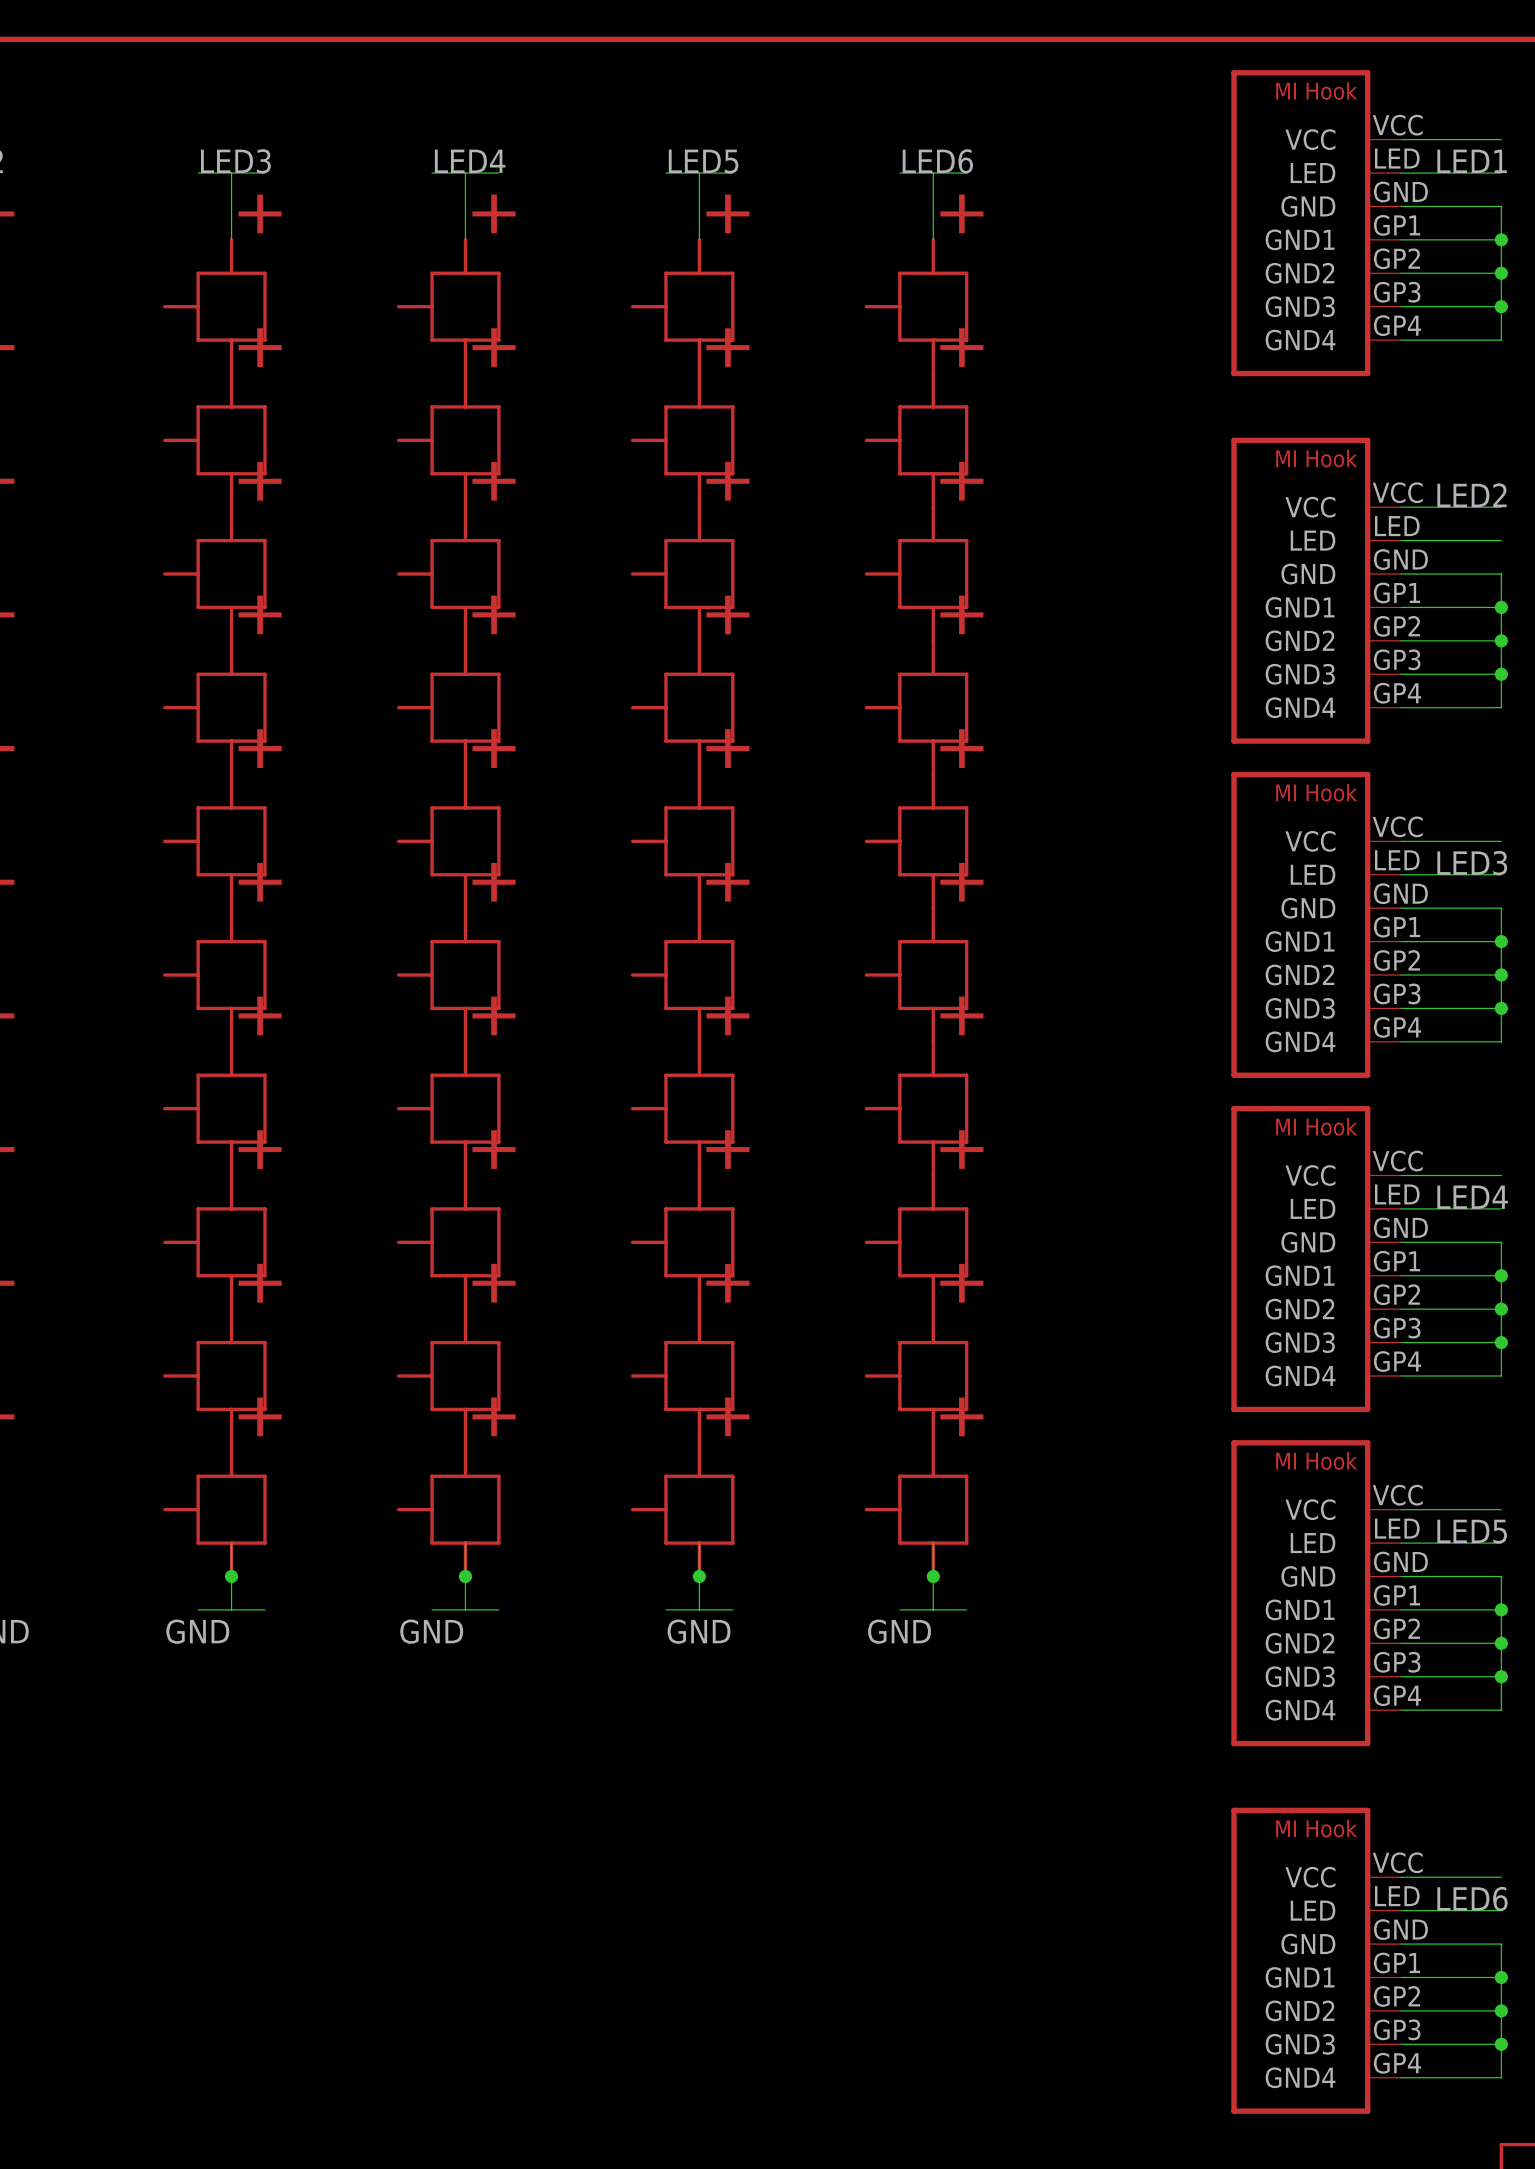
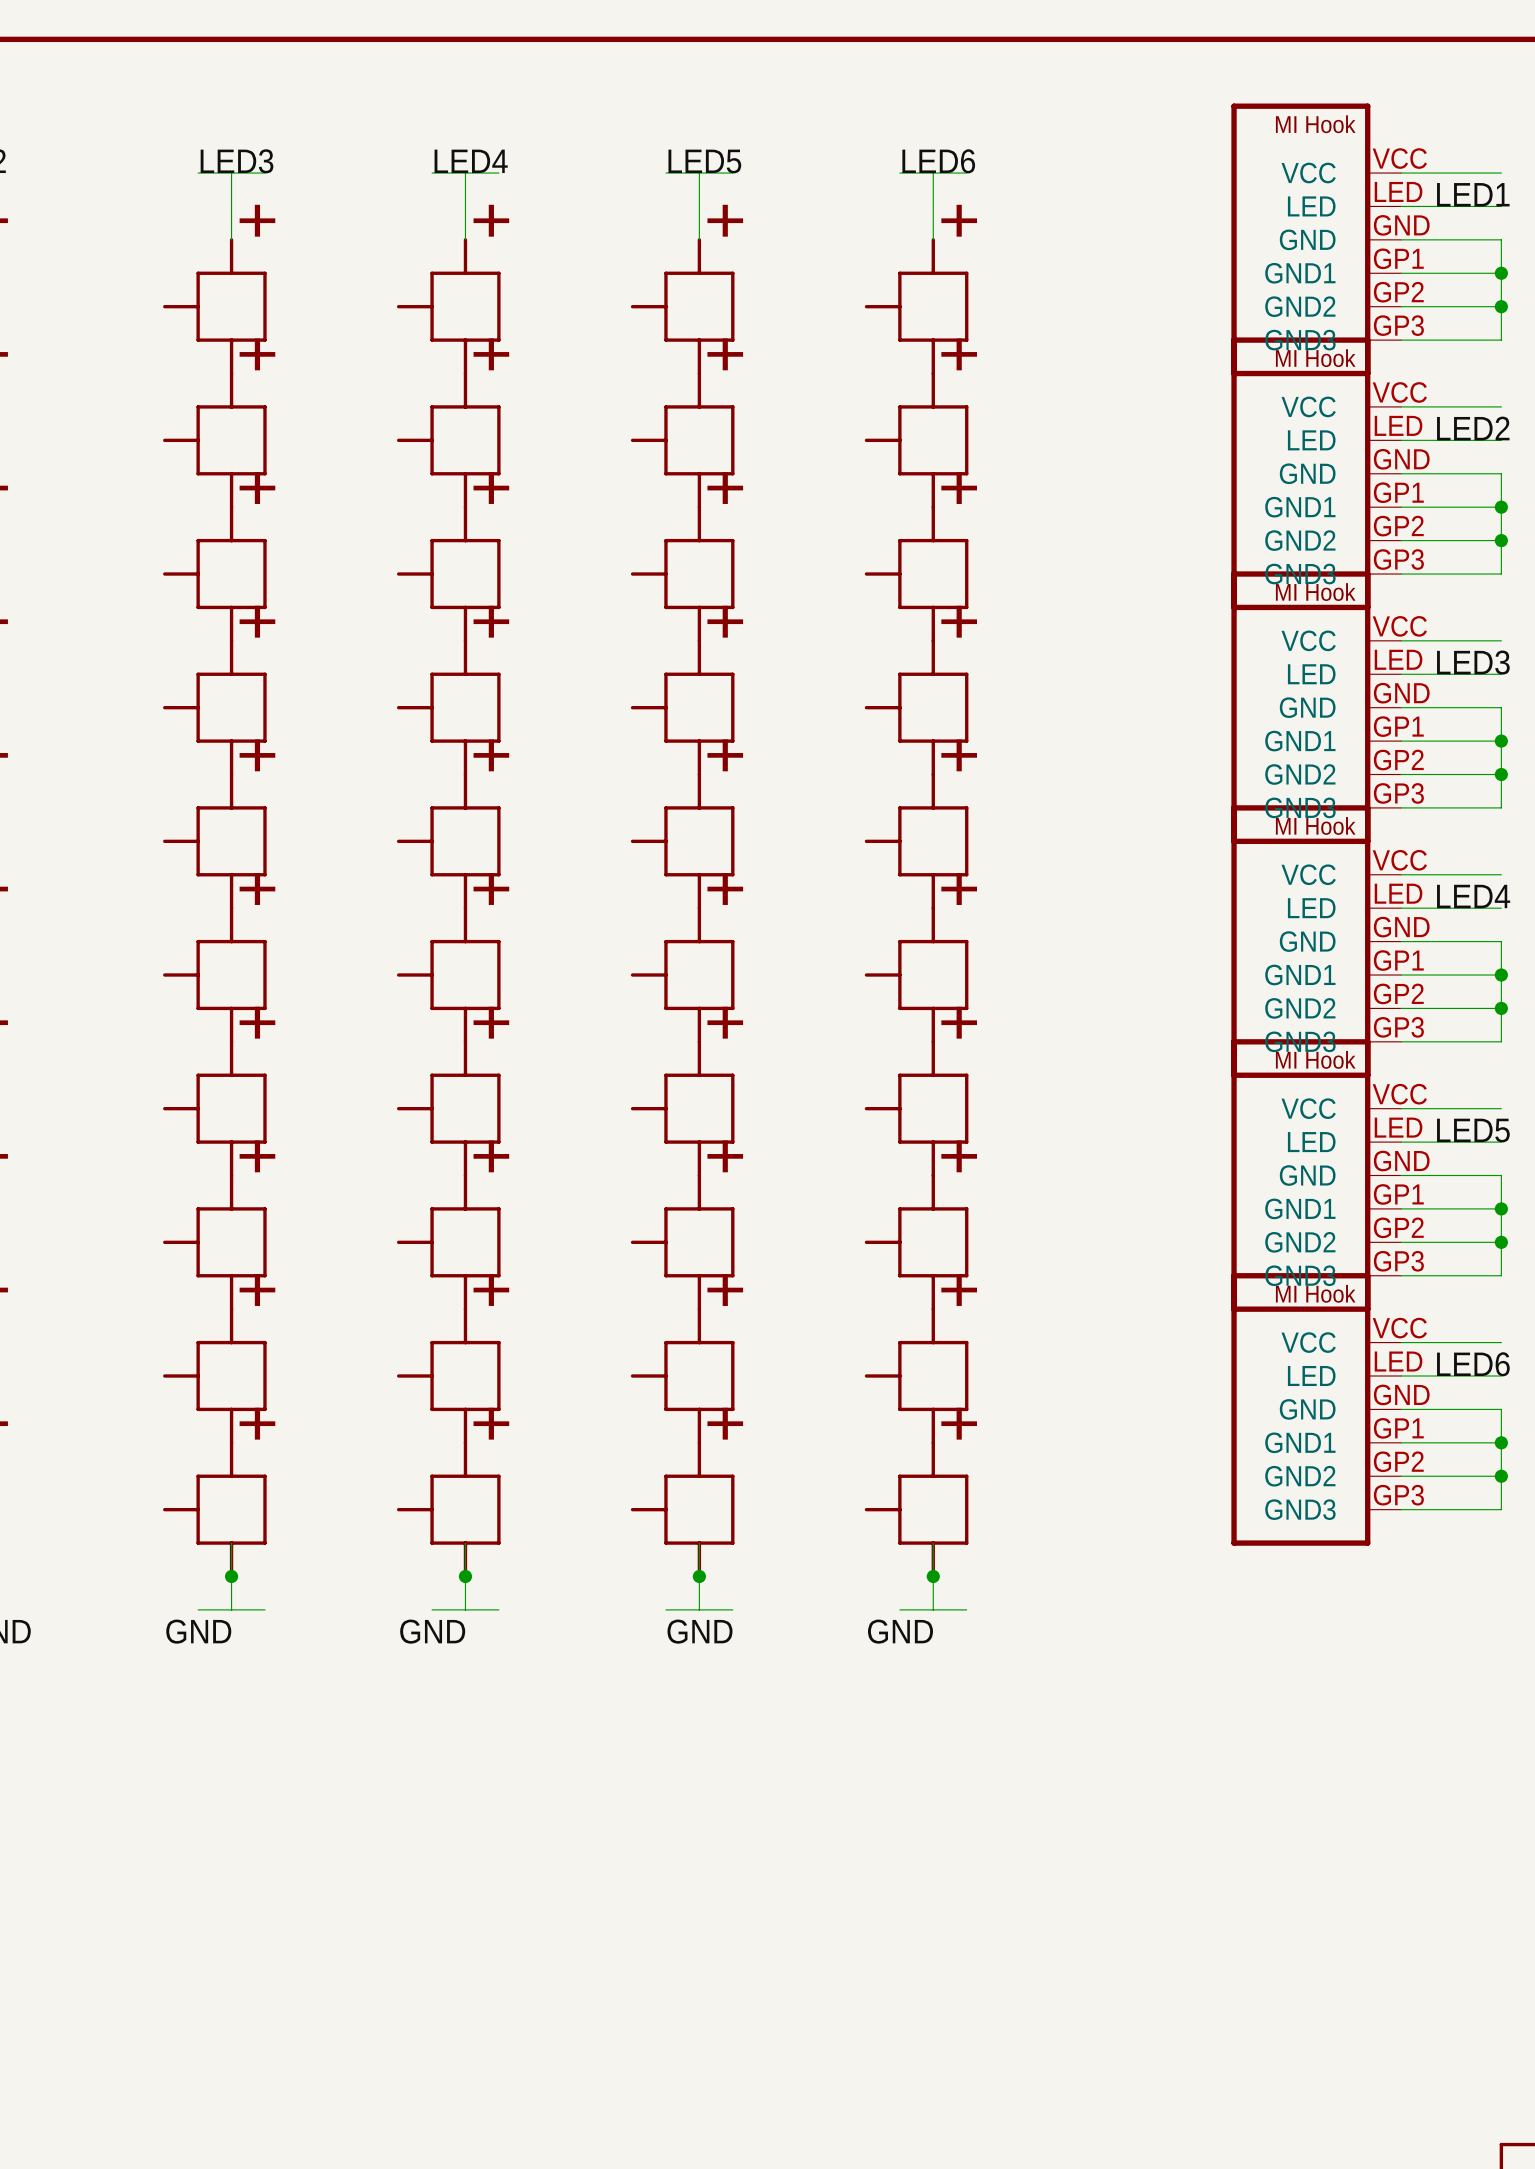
wire: (1401, 139) (1501, 139) -> (1401, 406) (1501, 406)
label position: LED1 (1472, 161) -> LED1 (1473, 194)
wire: (1501, 206) (1501, 239) -> none
part: (1316, 223) -> none
part: none -> (1316, 239)
junction: (1501, 239) -> none
part: none -> (1316, 473)
label position: LED2 (1471, 495) -> LED2 (1473, 428)
junction: none -> (1501, 507)
junction: none -> (1501, 540)
wire: (1501, 574) (1501, 707) -> (1501, 574) (1501, 473) (1401, 473)
part: (1316, 590) -> none
wire: (1401, 607) (1501, 607) -> (1401, 440) (1501, 440)
junction: (1501, 607) -> none
junction: (1501, 640) -> none
junction: (1501, 674) -> none
part: none -> (1316, 707)
wire: none -> (1501, 707) (1501, 807) (1401, 807)
wire: none -> (1401, 741) (1501, 741)
junction: none -> (1501, 741)
junction: none -> (1501, 774)
wire: (1401, 841) (1501, 841) -> (1401, 774) (1501, 774)
label position: LED3 (1472, 863) -> LED3 (1473, 662)
wire: (1501, 908) (1501, 941) -> none
part: (1316, 924) -> none
part: none -> (1316, 941)
junction: (1501, 941) -> none
wire: none -> (1401, 1108) (1501, 1108)
label: none -> LED5 (1473, 1130)
part: none -> (1316, 1175)
wire: none -> (1501, 1175) (1501, 1242)
label position: LED4 (1472, 1197) -> LED4 (1473, 896)
junction: none -> (1501, 1208)
junction: none -> (1501, 1242)
part: (1316, 1259) -> none
wire: (1501, 1275) (1501, 1376) -> none
junction: (1501, 1275) -> none
wire: (1401, 1309) (1501, 1309) -> (1401, 1142) (1501, 1142)
junction: (1501, 1309) -> none
junction: (1501, 1342) -> none
label: none -> LED6 (1473, 1364)
part: none -> (1316, 1409)
wire: none -> (1401, 1409) (1501, 1409) (1501, 1509)
junction: none -> (1501, 1442)
junction: none -> (1501, 1476)
label: LED5 (1472, 1531) -> none
wire: (1401, 1543) (1501, 1543) -> none
wire: (1401, 1576) (1501, 1576) (1501, 1710) (1401, 1710) -> none
part: (1316, 1593) -> none
wire: (1401, 1609) (1501, 1609) -> (1401, 1442) (1501, 1442)
junction: (1501, 1609) -> none
wire: (1401, 1643) (1501, 1643) -> (1401, 1476) (1501, 1476)
junction: (1501, 1643) -> none
wire: (1401, 1676) (1501, 1676) -> none
junction: (1501, 1676) -> none
wire: (1401, 1877) (1501, 1877) -> none
label: LED6 (1472, 1898) -> none
wire: (1401, 1910) (1501, 1910) -> none
wire: (1401, 1944) (1501, 1944) (1501, 2077) (1401, 2077) -> none
part: (1316, 1960) -> none
wire: (1401, 1977) (1501, 1977) -> none
junction: (1501, 1977) -> none
wire: (1401, 2010) (1501, 2010) -> none
junction: (1501, 2010) -> none
wire: (1401, 2044) (1501, 2044) -> none
junction: (1501, 2044) -> none

